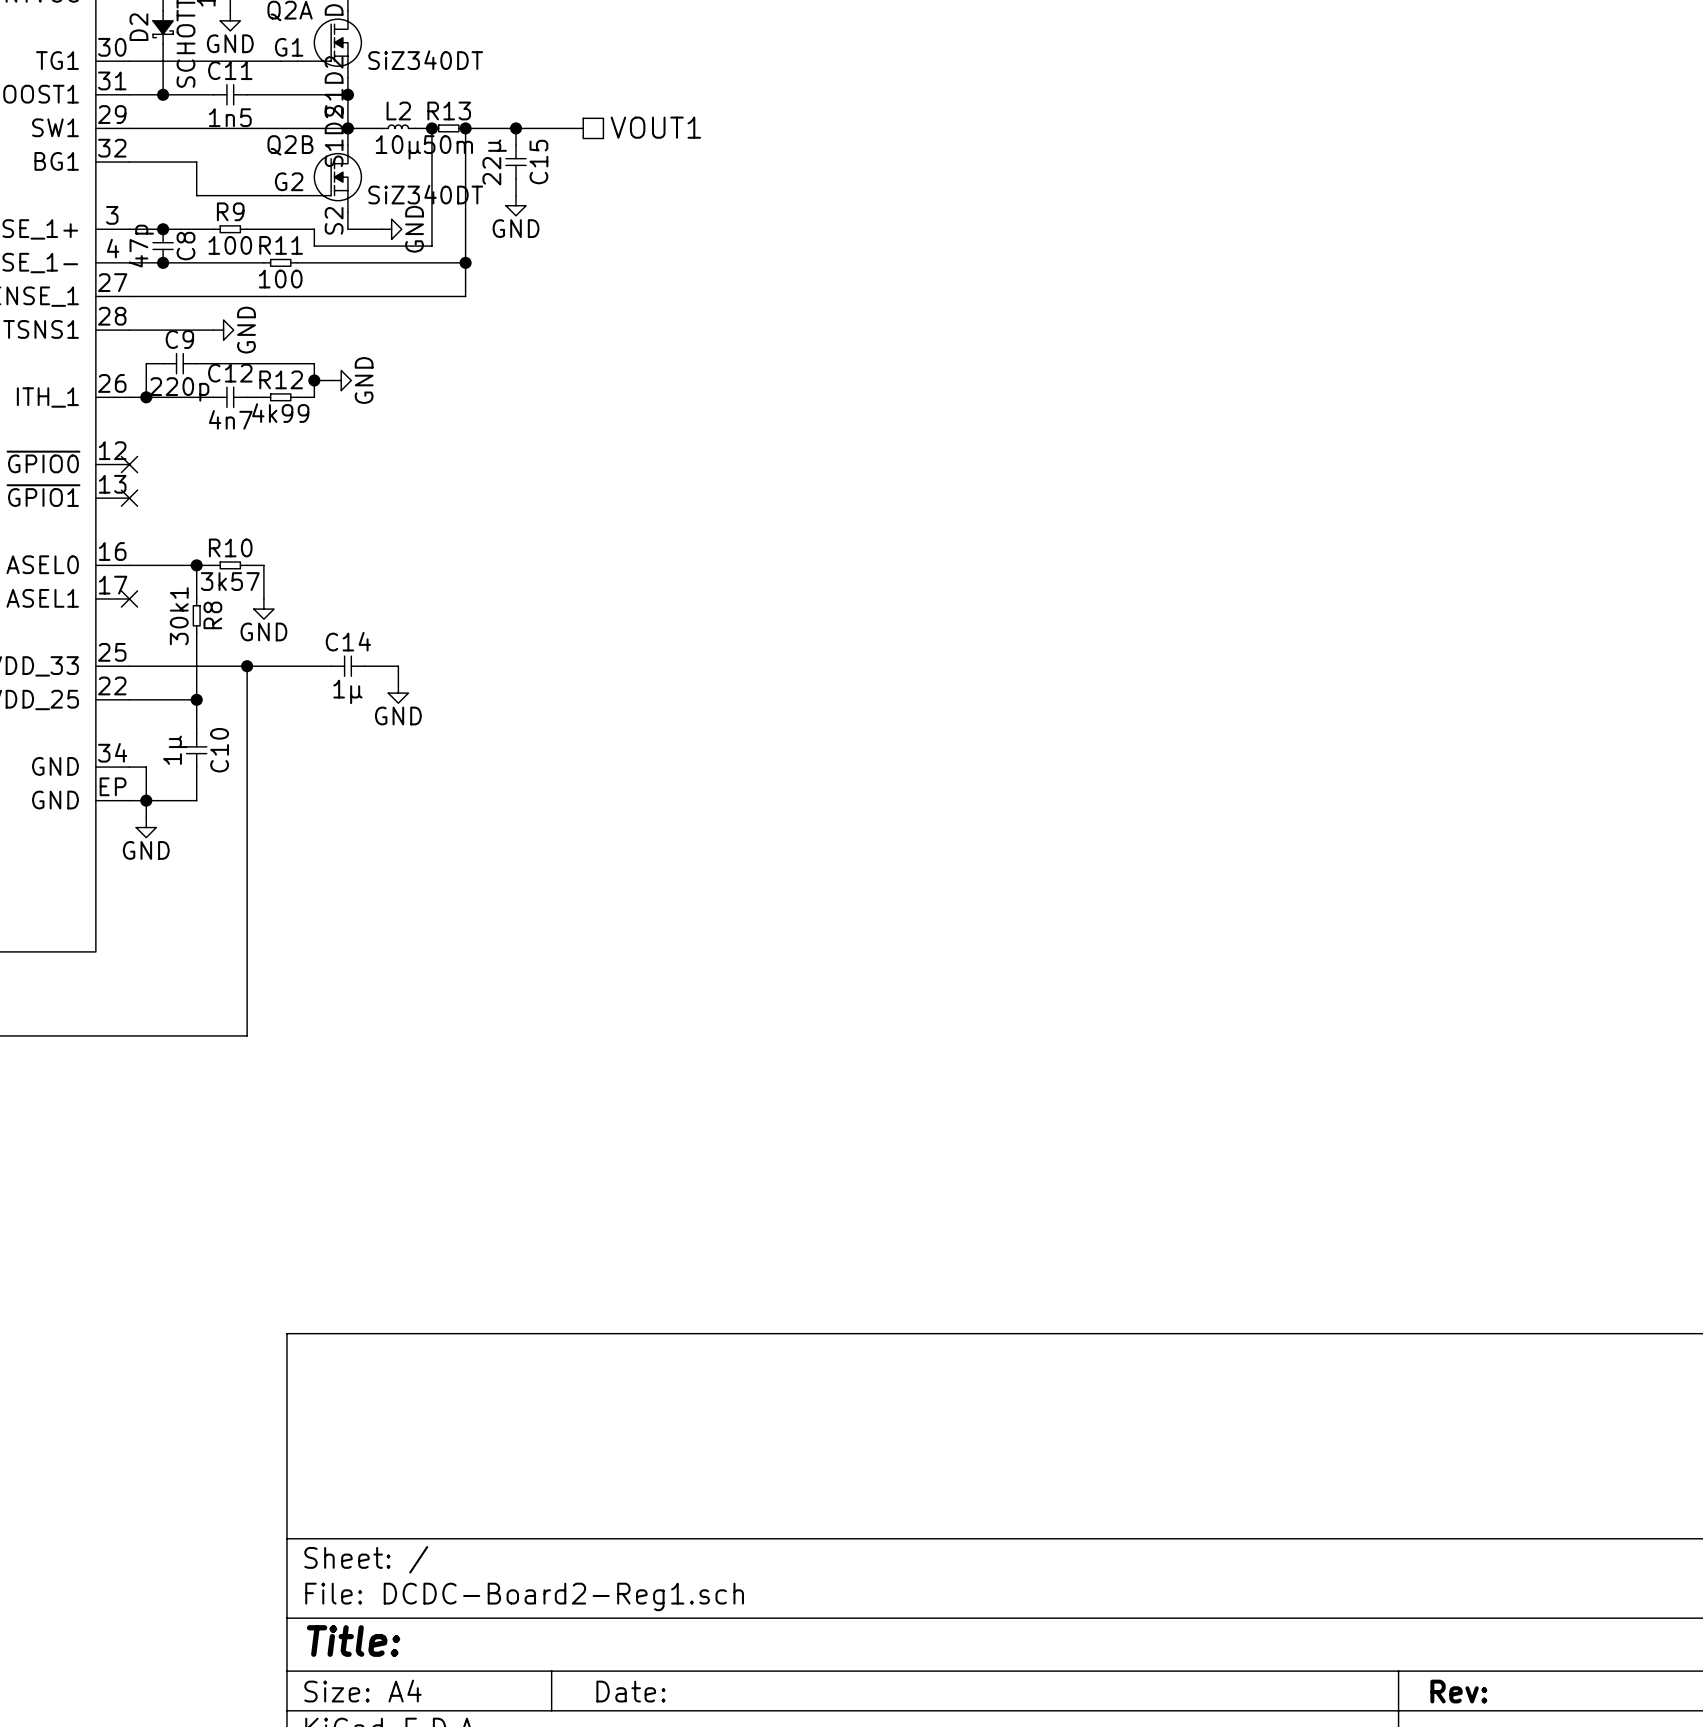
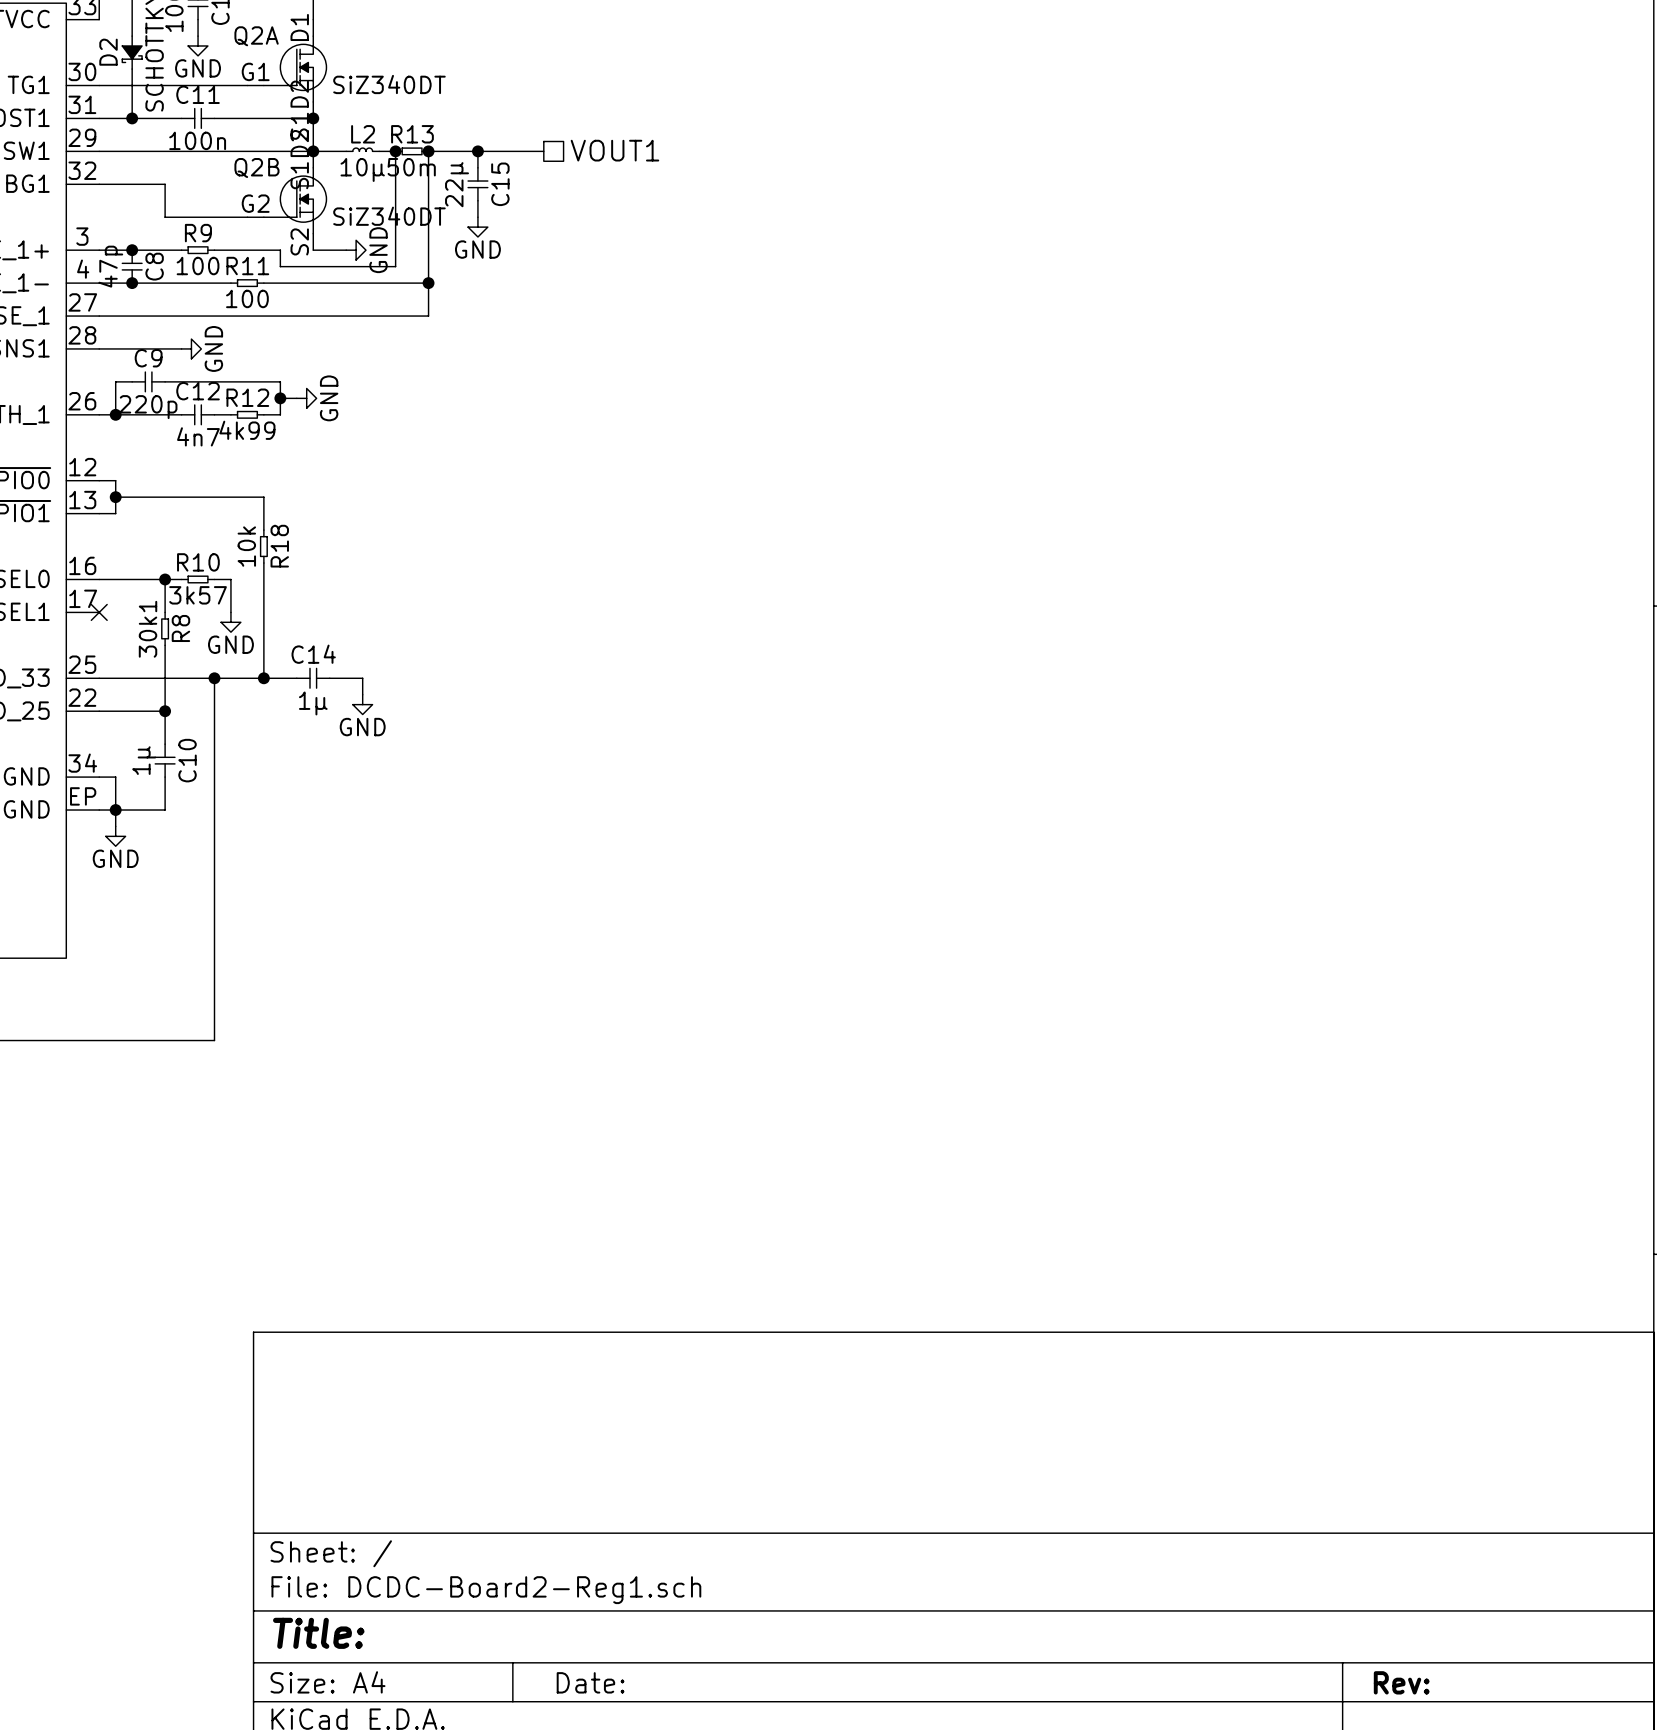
C11 value: 1n5 (230, 117) -> 100n (197, 140)
wire: none -> (99, 480) (115, 480) (115, 513) (99, 513)
no-connect mark: (129, 464) -> none
wire: none -> (115, 497) (263, 497) (263, 530)
junction: none -> (115, 497)
no-connect mark: (129, 498) -> none
R18: none -> 10k (263, 546)
wire: none -> (263, 563) (263, 678)
junction: none -> (263, 678)

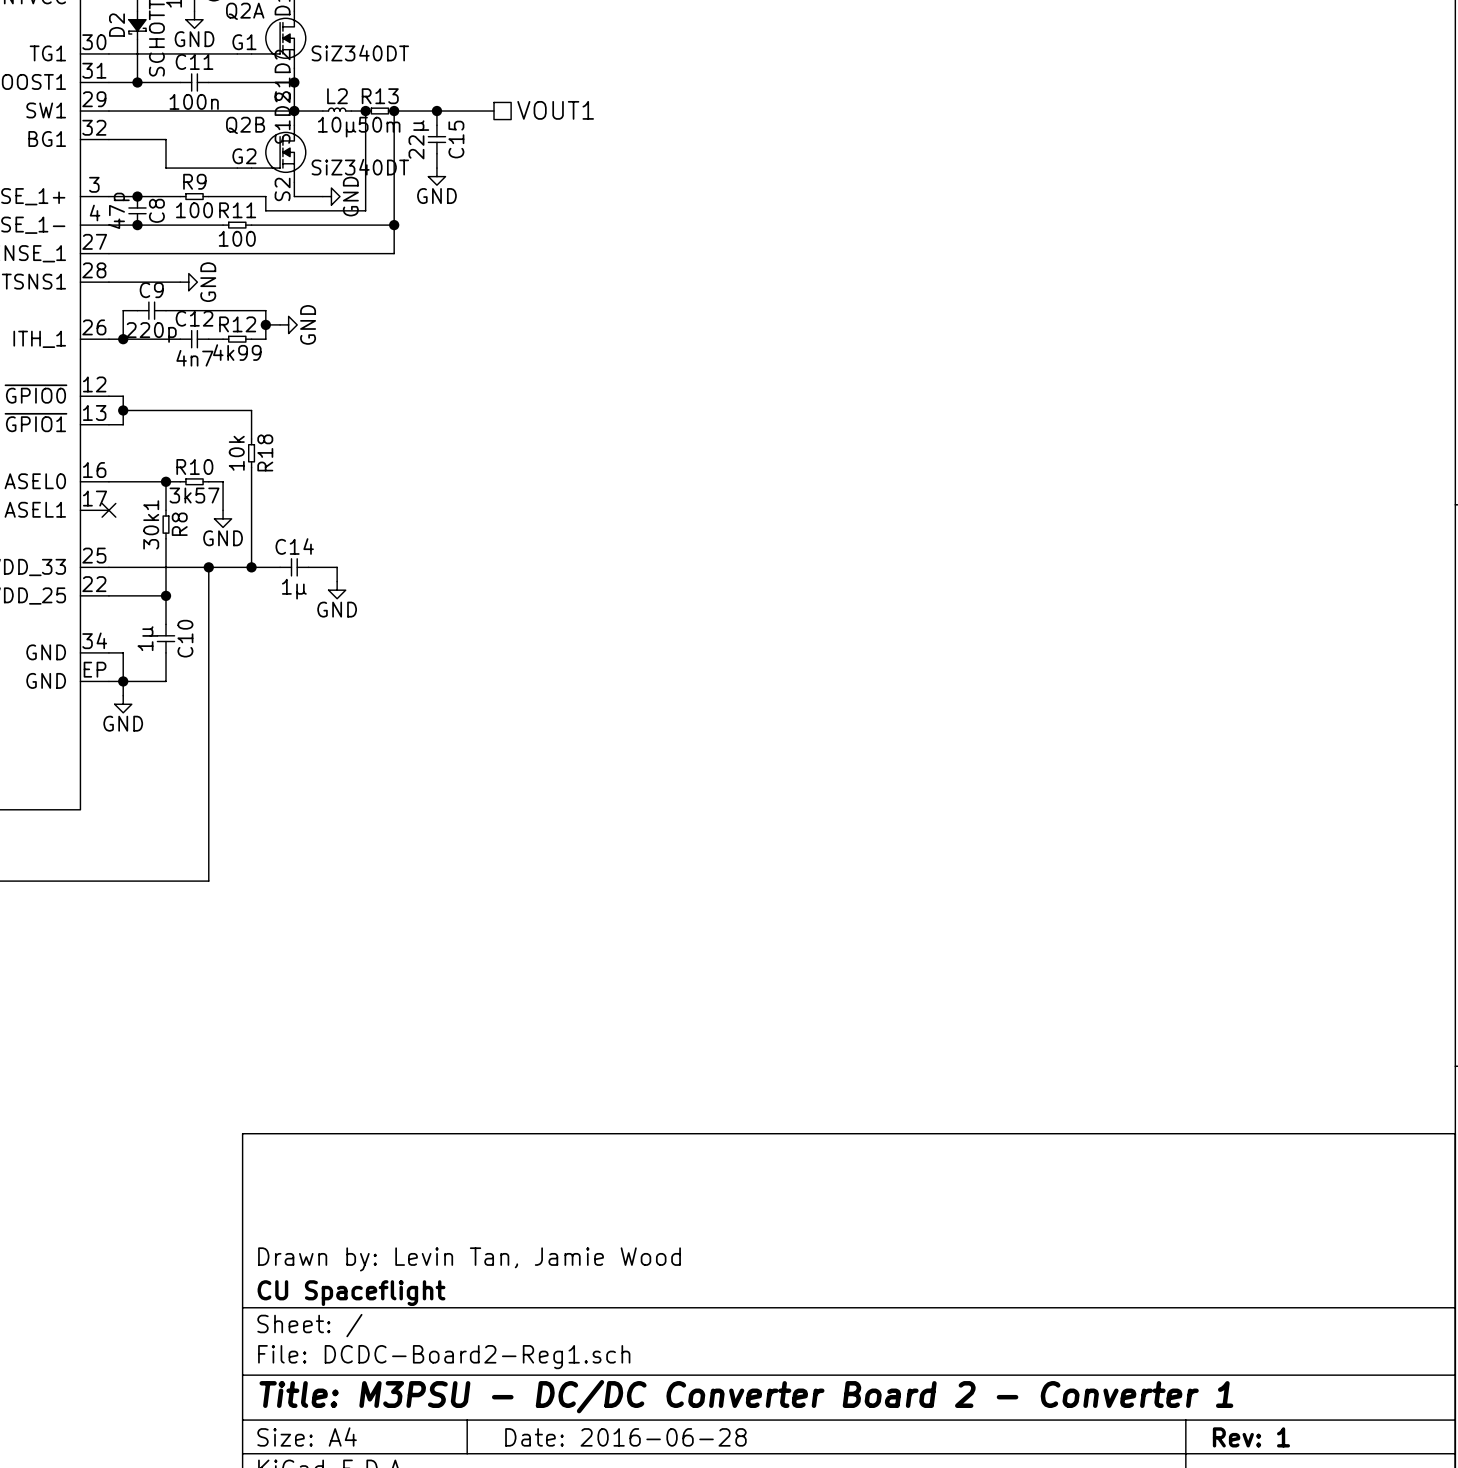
title block: none -> Drawn by: Levin Tan, Jamie Wood (469, 1259)
title block: none -> CU Spaceflight (351, 1293)
title block: Title: (318, 1633) -> Title: M3PSU - DC/DC Converter Board 2 - Converter 1 (746, 1396)
title block: Date: (590, 1682) -> Date: 2016-06-28 (625, 1437)
title block: Rev: (1401, 1682) -> Rev: 1 (1251, 1437)

